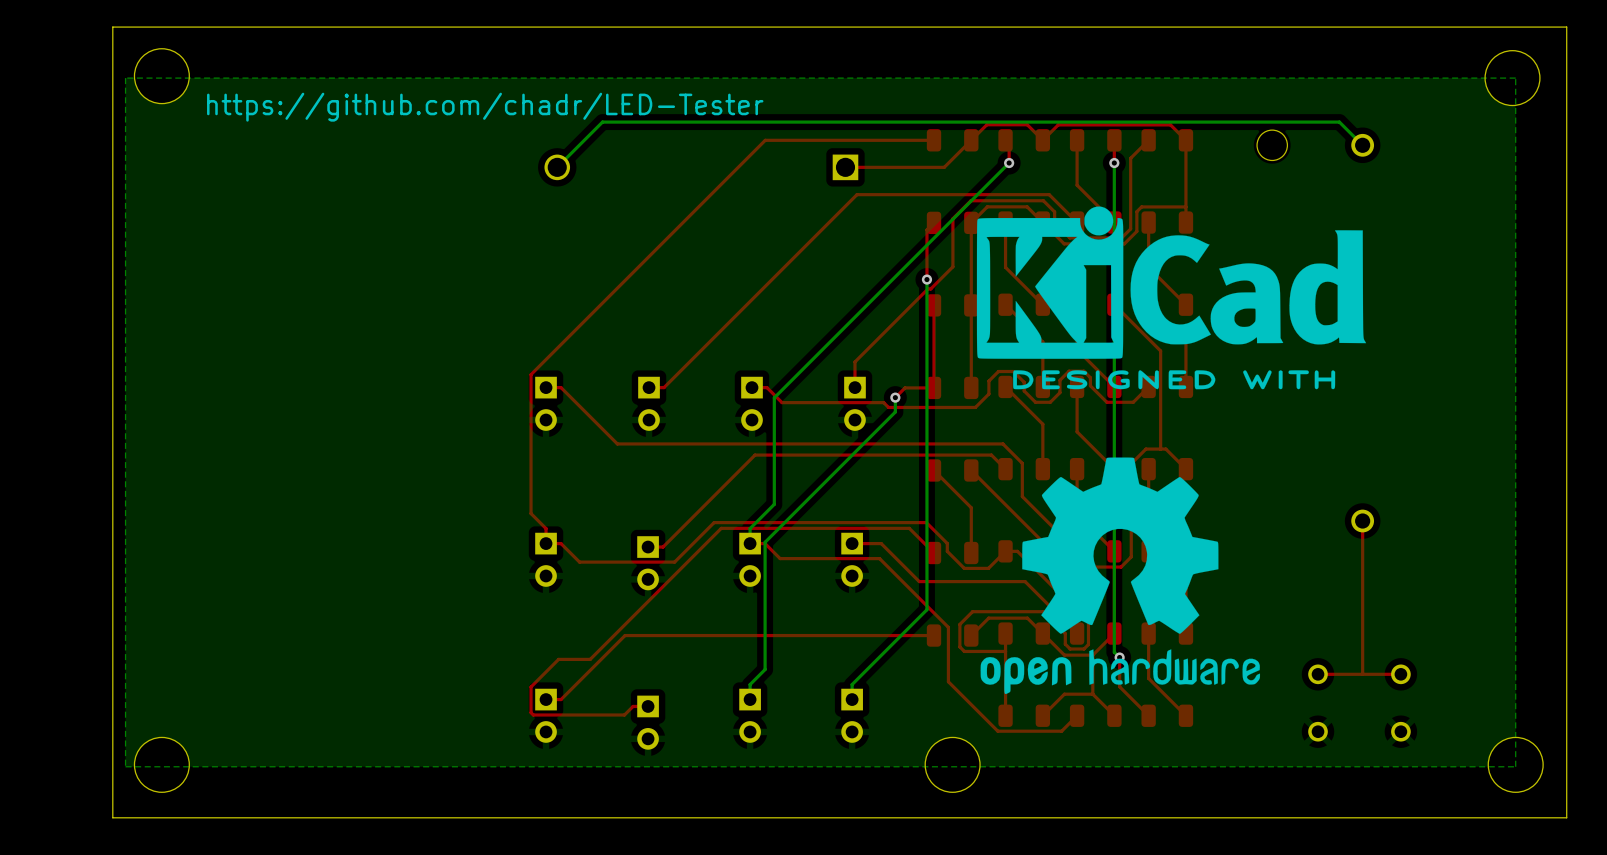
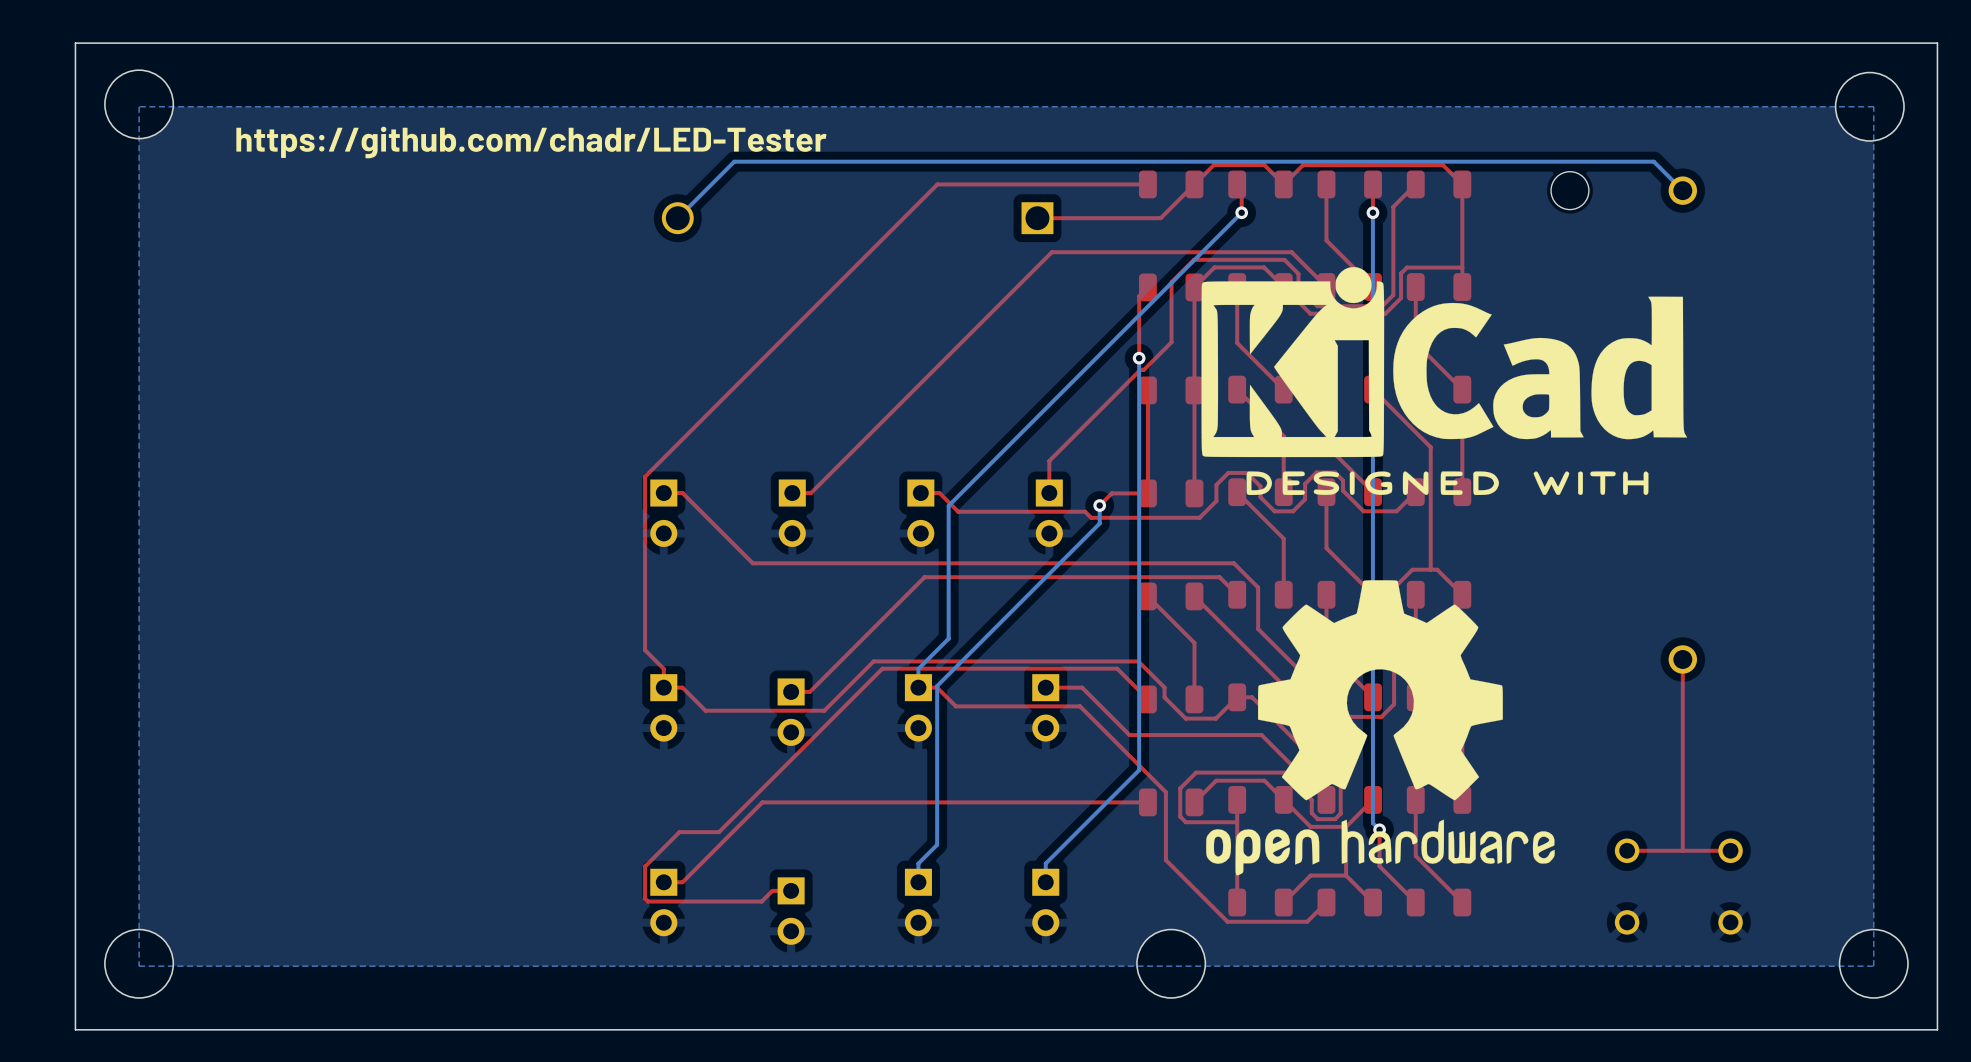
board edge: (112, 27) (112, 817) -> (123, 43) (75, 43) (75, 1029) (123, 1029)
round board edge position: (161, 76) -> (139, 104)
round board edge position: (161, 764) -> (139, 963)

